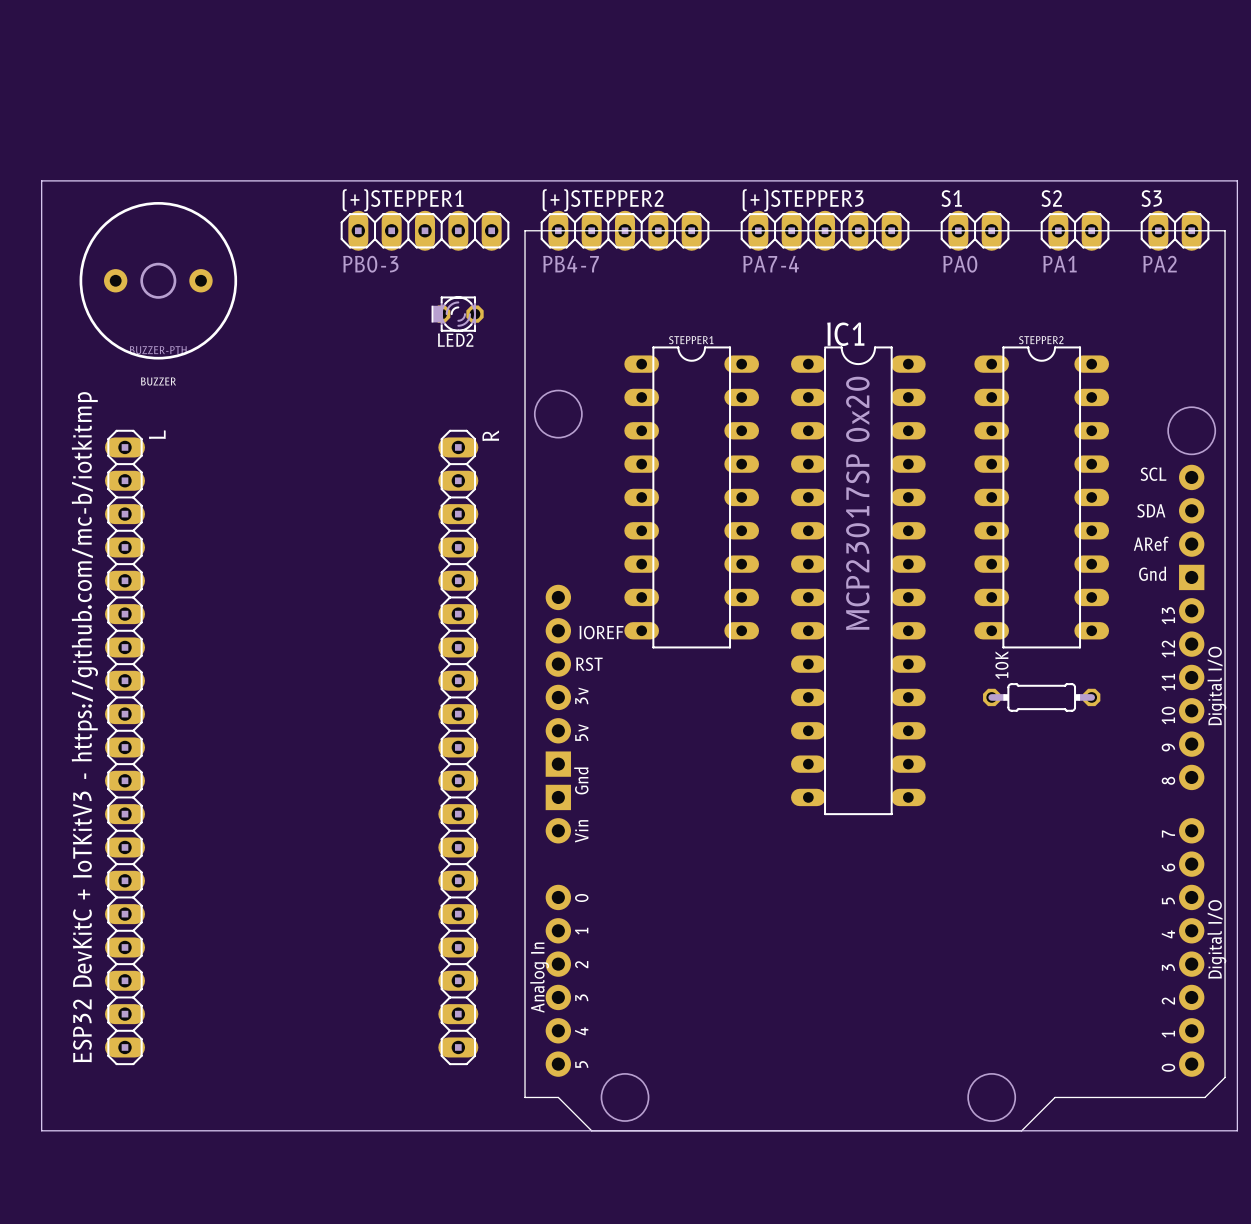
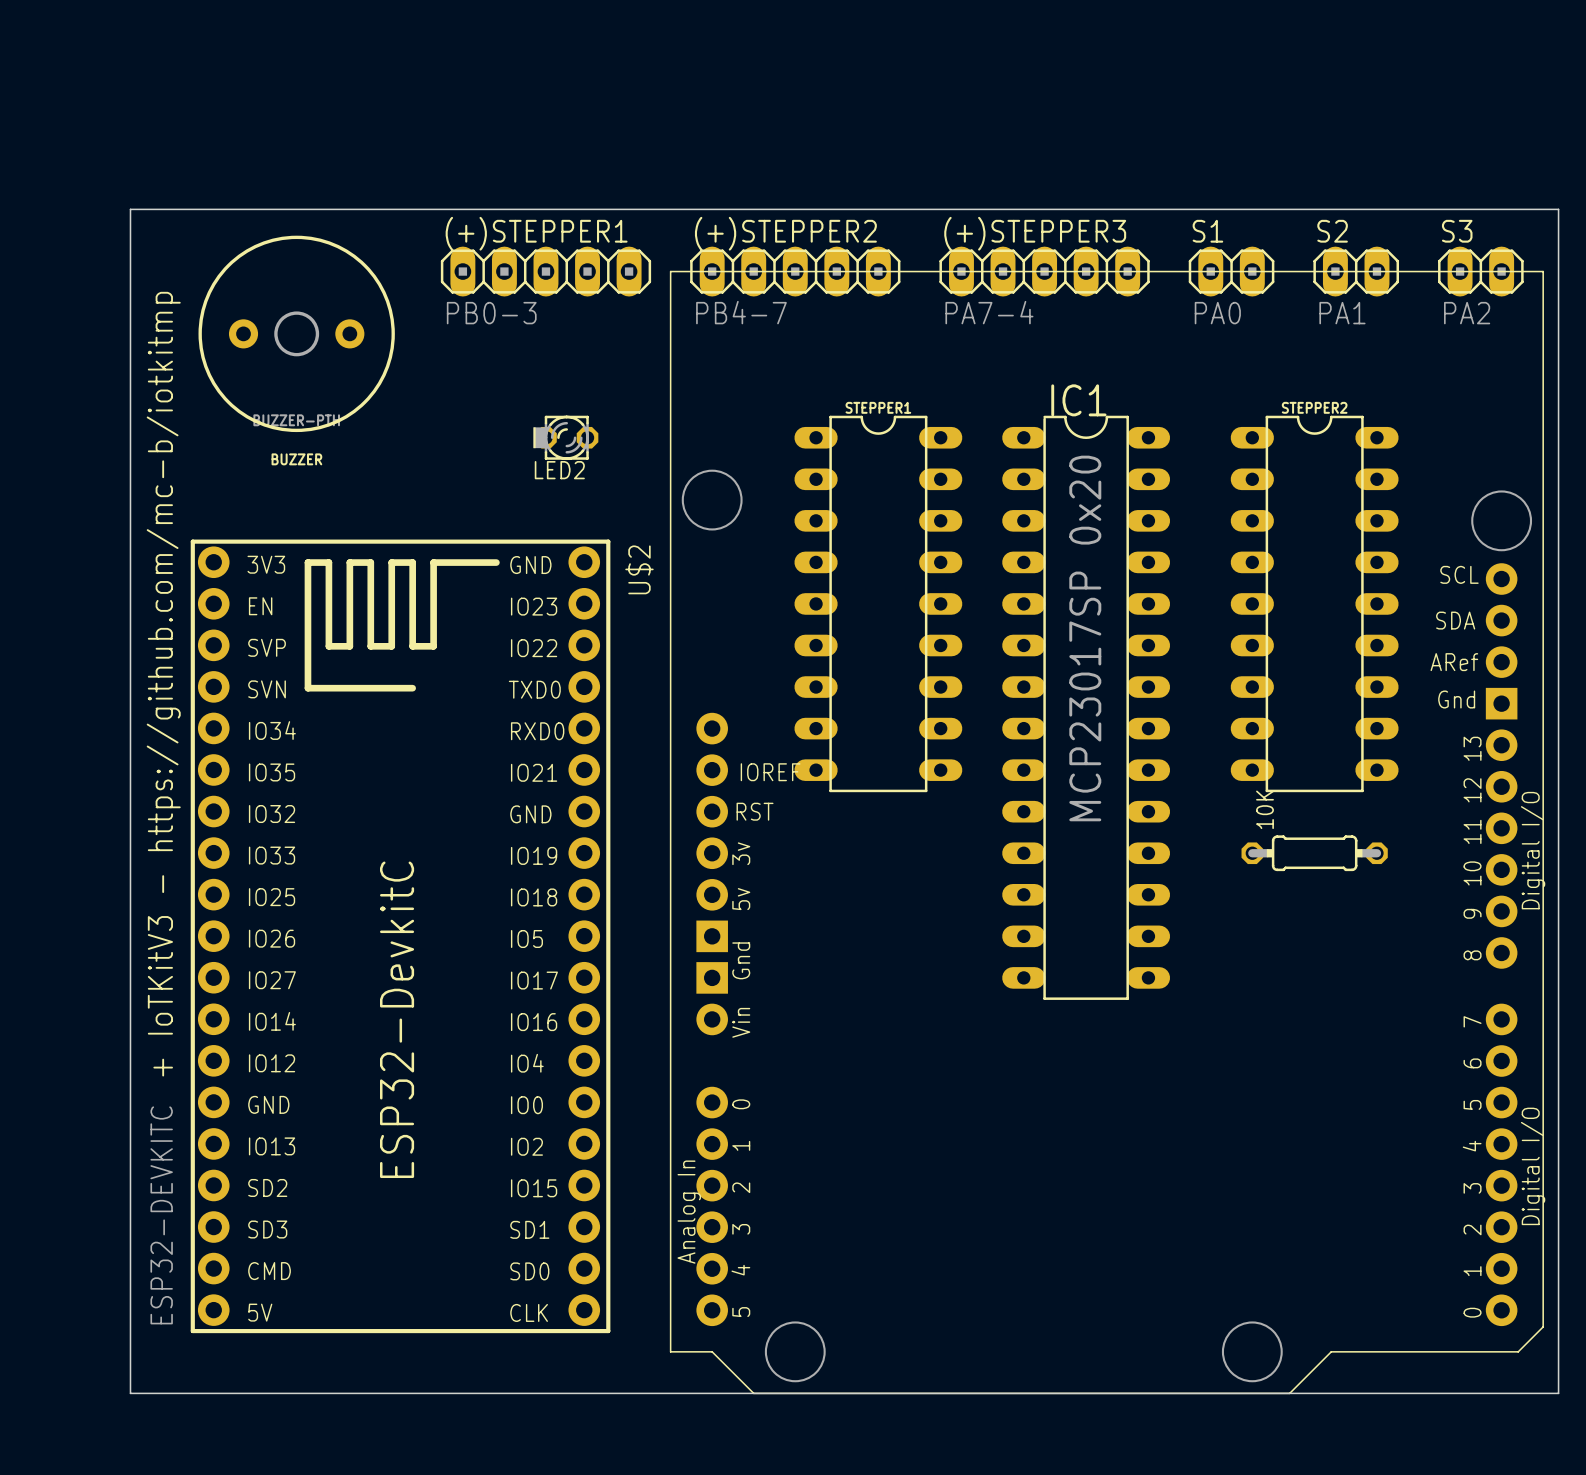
board edge: (91, 180) (41, 180) (41, 1130) (91, 1130) -> (130, 209) (130, 1393)
BUZZER position: (158, 280) -> (296, 333)
LED2 position: (457, 314) -> (565, 437)
text: ESP32 DevKitC + IoTKitV3 - https://github.com/mc-b/iotkitmp (84, 727) -> + IoTKitV3 - https://github.com/mc-b/iotkitmp (163, 684)
L: (124, 747) -> none
R: (458, 747) -> none
U$2: none -> (400, 936)

